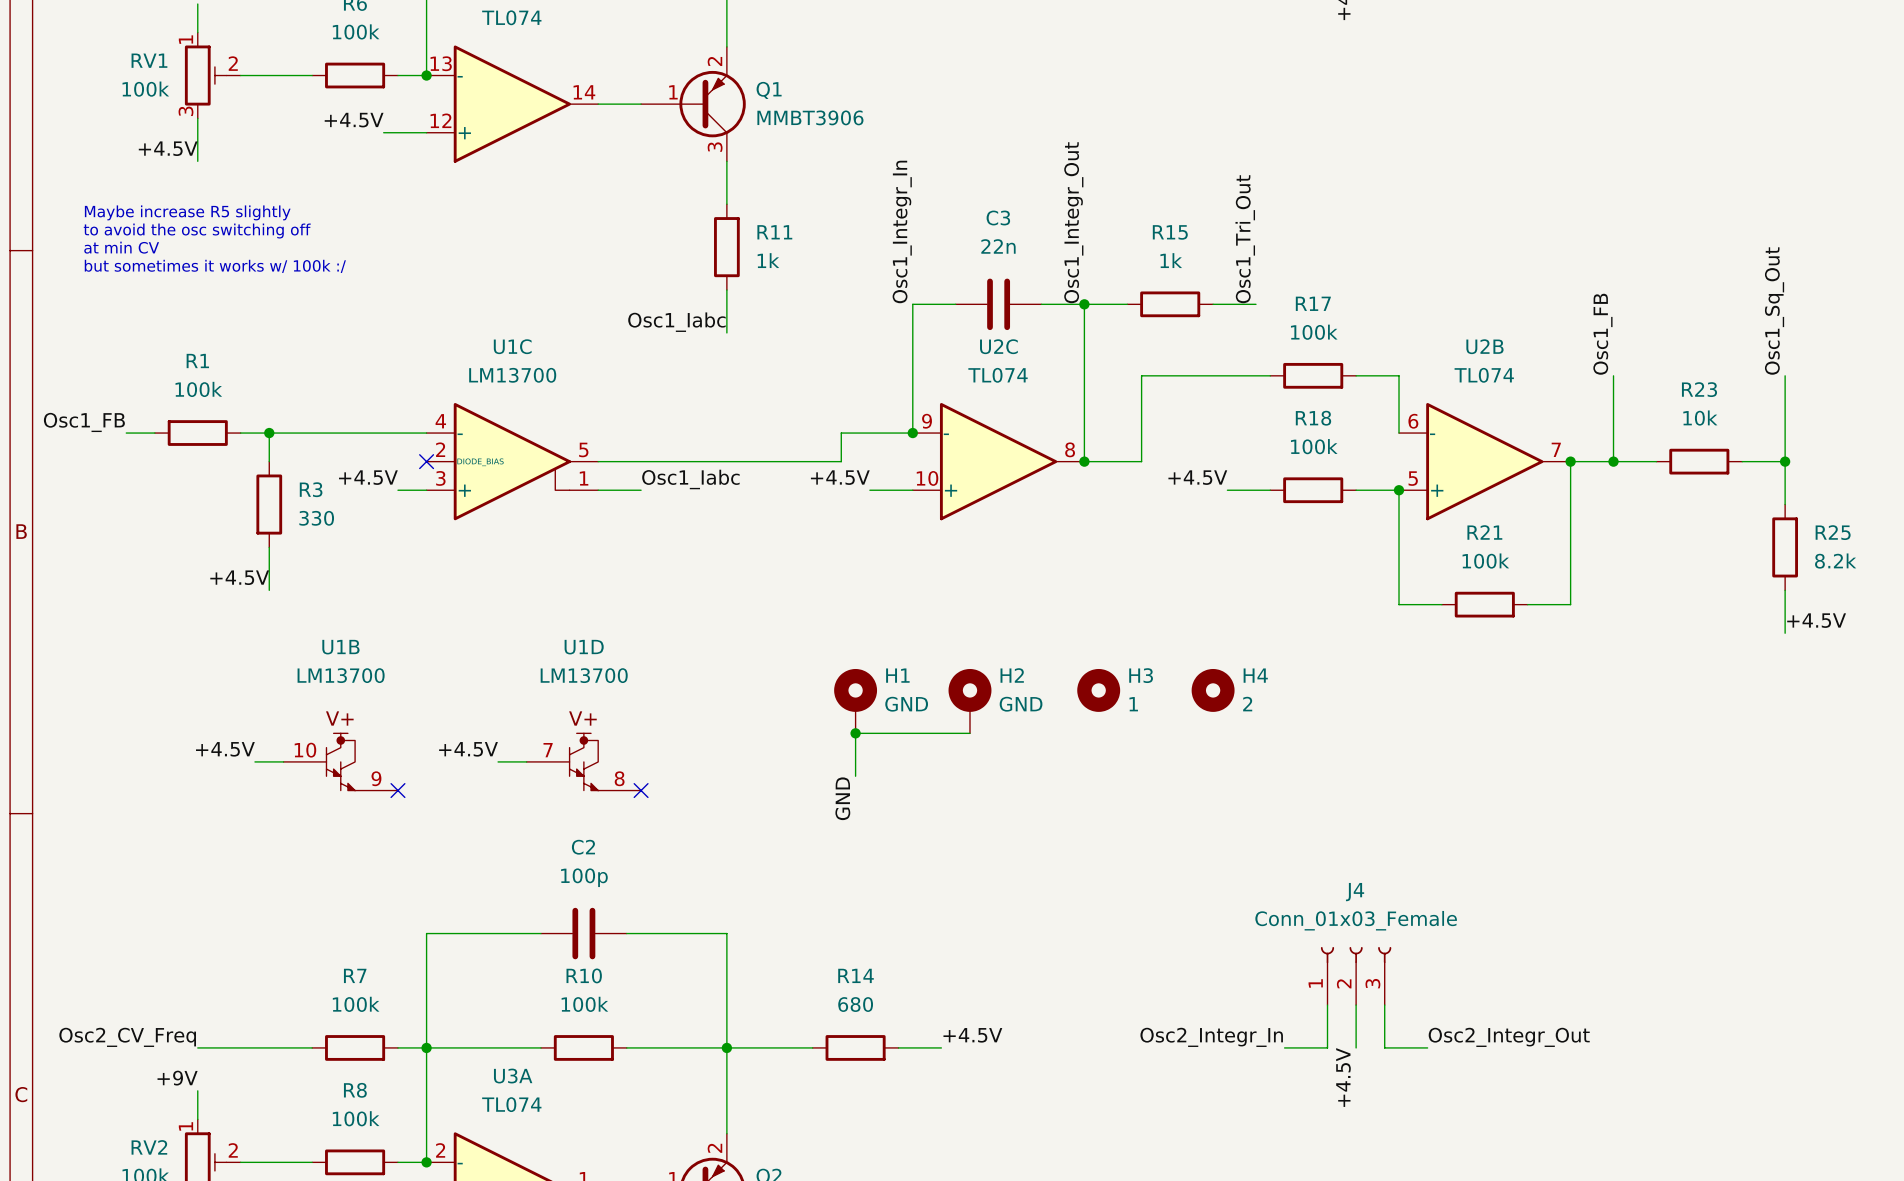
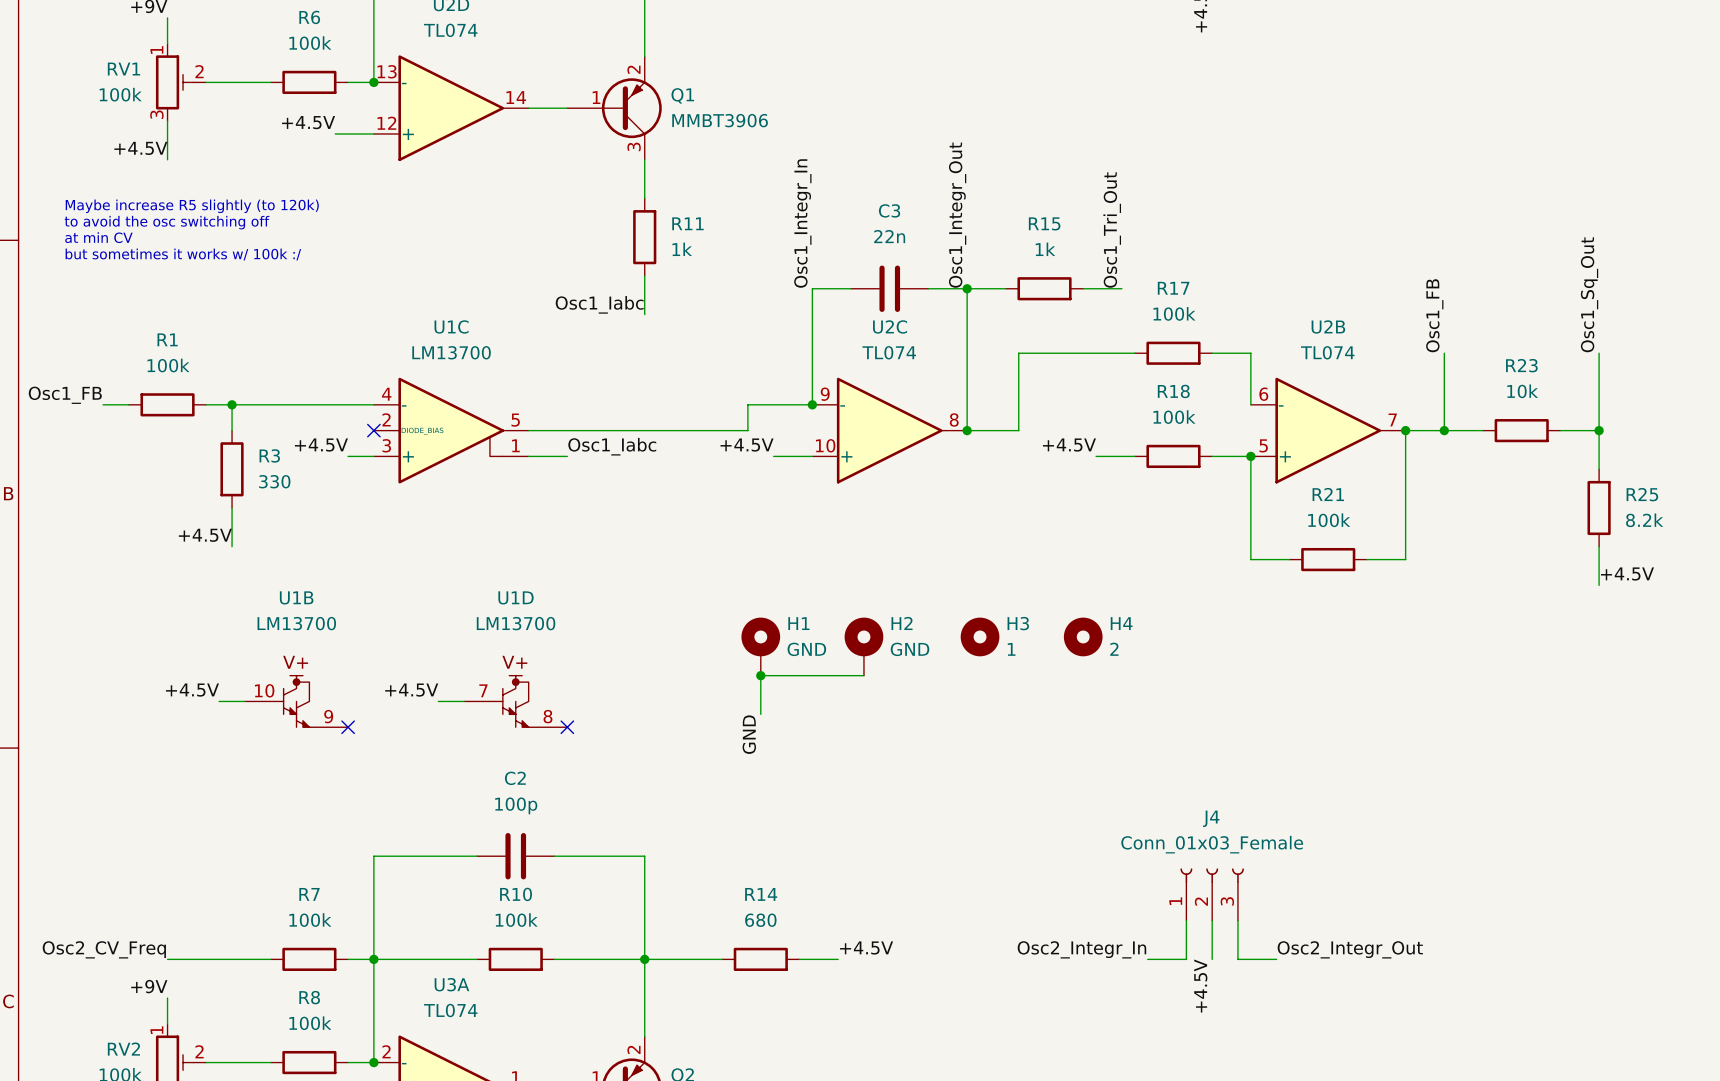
text: Maybe increase R5 slightly (187, 212) -> Maybe increase R5 slightly (to 120k) (192, 206)

